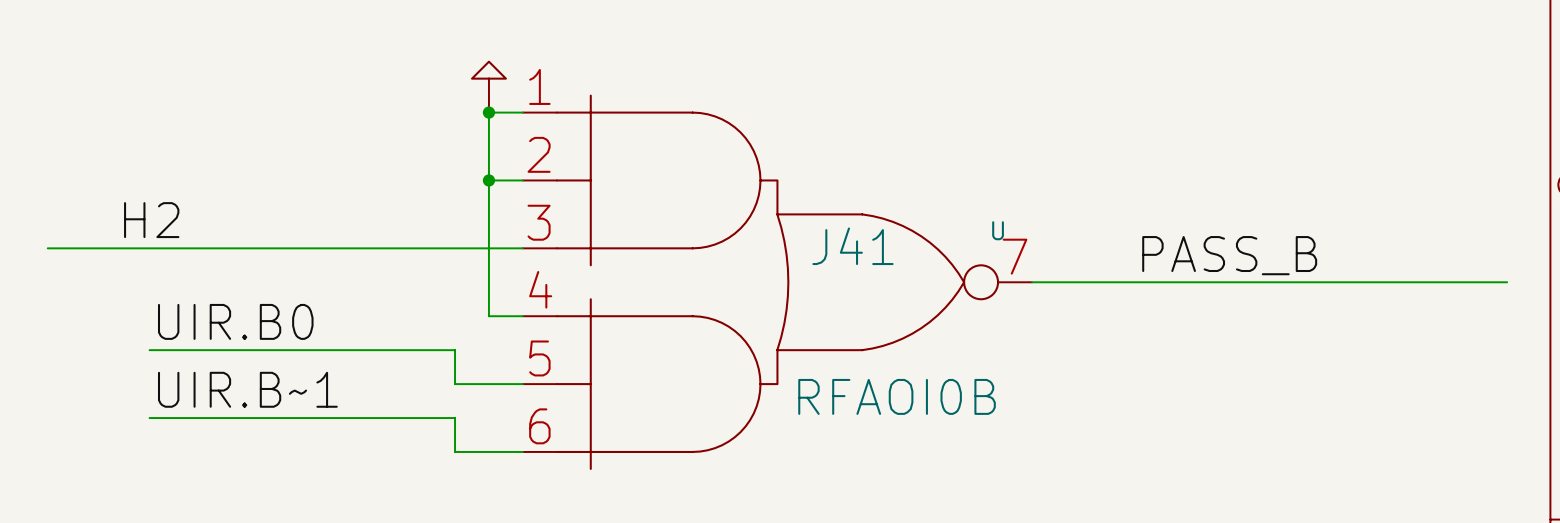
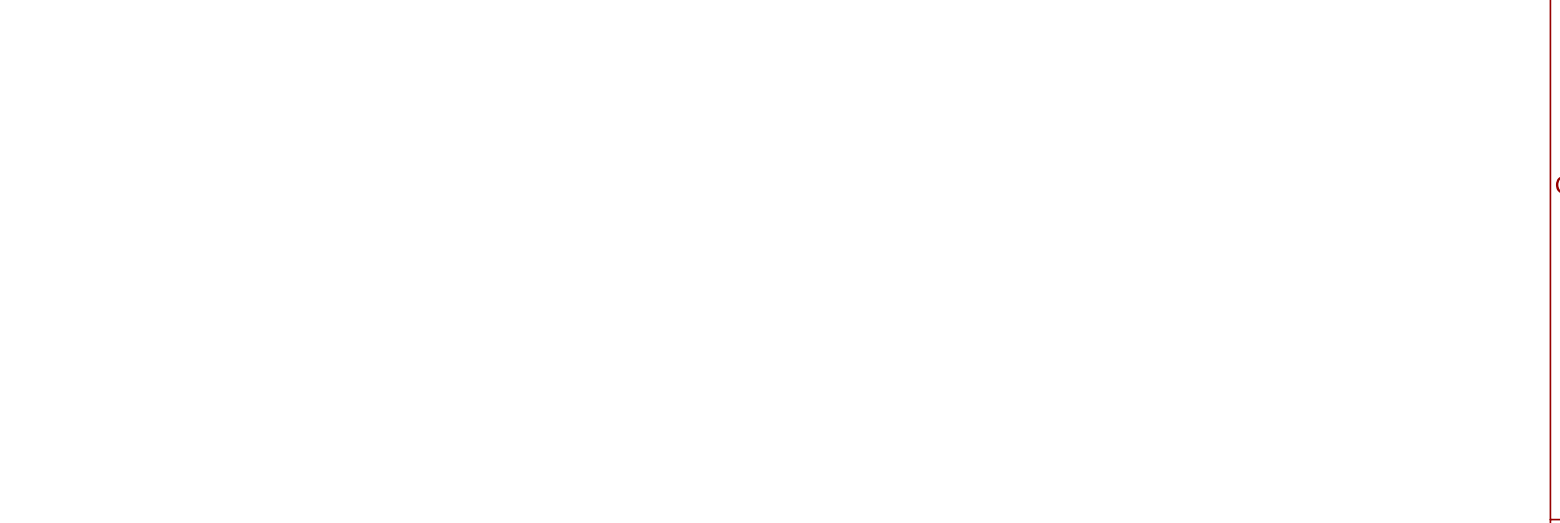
power symbol: (488, 86) -> none
junction: (488, 112) -> none
wire: (522, 112) (488, 112) (488, 316) (522, 316) -> none
wire: (488, 180) (522, 180) -> none
junction: (488, 180) -> none
label: H2 (151, 220) -> none
wire: (47, 248) (522, 248) -> none
label: PASS_B (1229, 255) -> none
U: (777, 282) -> none
wire: (1031, 282) (1507, 282) -> none
label: UIR.B0 (235, 321) -> none
wire: (149, 350) (455, 350) (455, 384) (522, 384) -> none
label: UIR.B~1 (247, 389) -> none
wire: (149, 418) (455, 418) (455, 451) (522, 451) -> none

